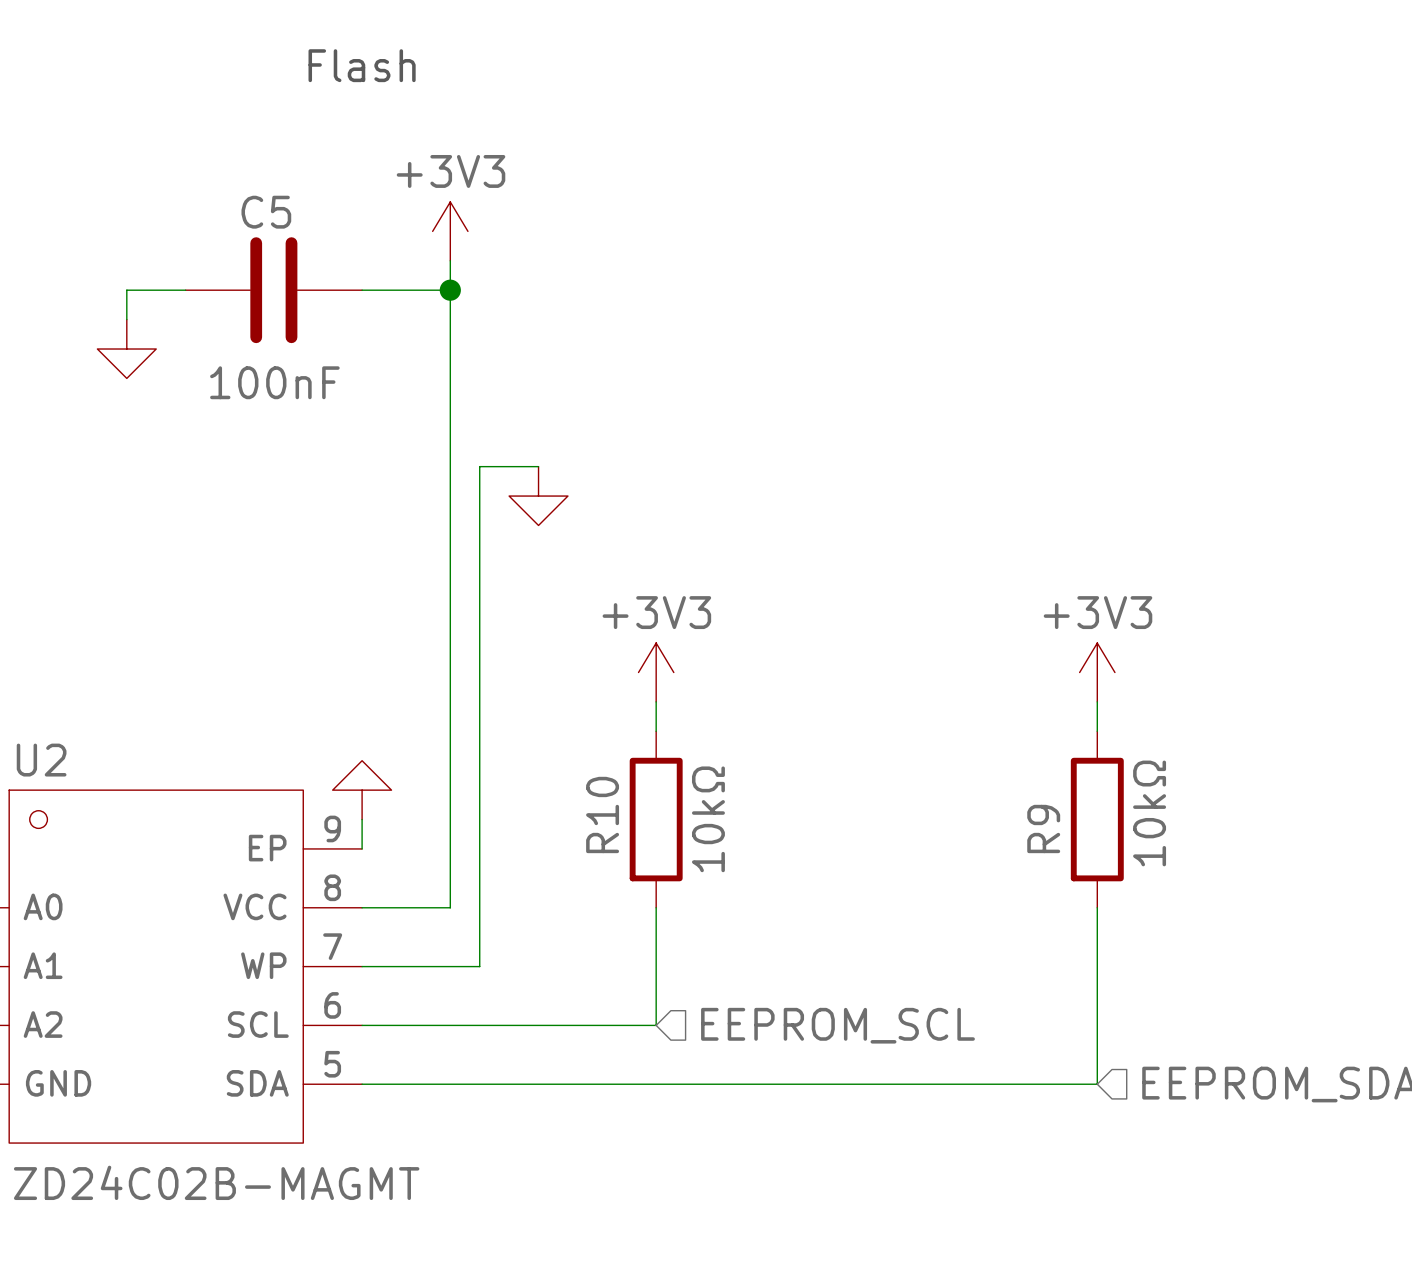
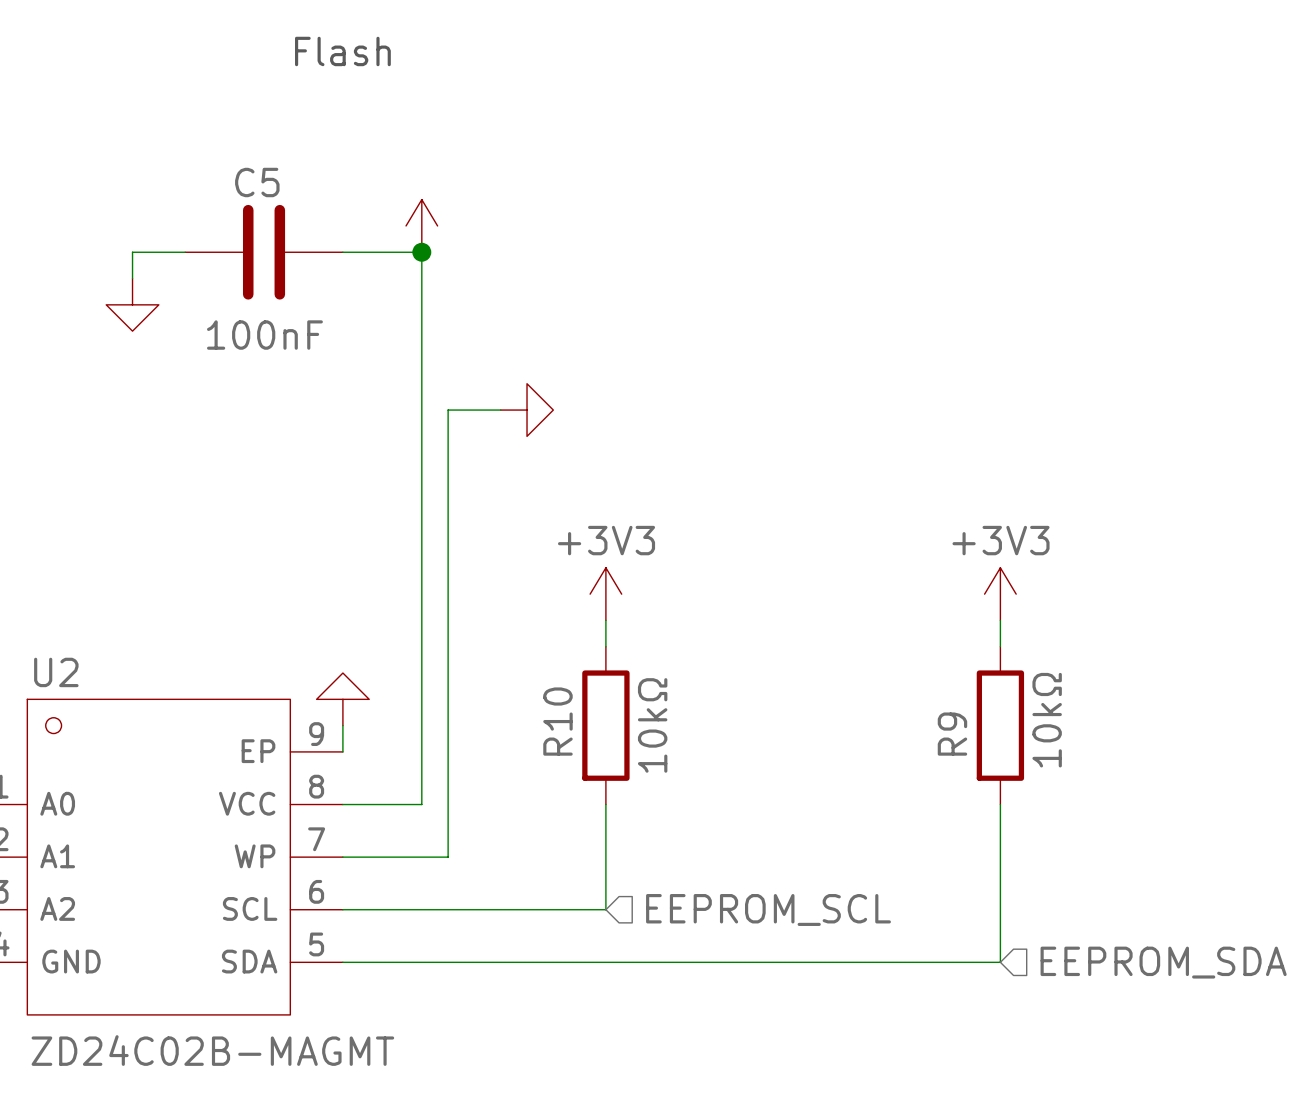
power symbol: +3V3 (450, 231) -> none
power symbol: none -> (421, 225)
power symbol rotation: 0° (538, 496) -> 90° counterclockwise (527, 410)
power symbol position: (538, 496) -> (527, 410)

